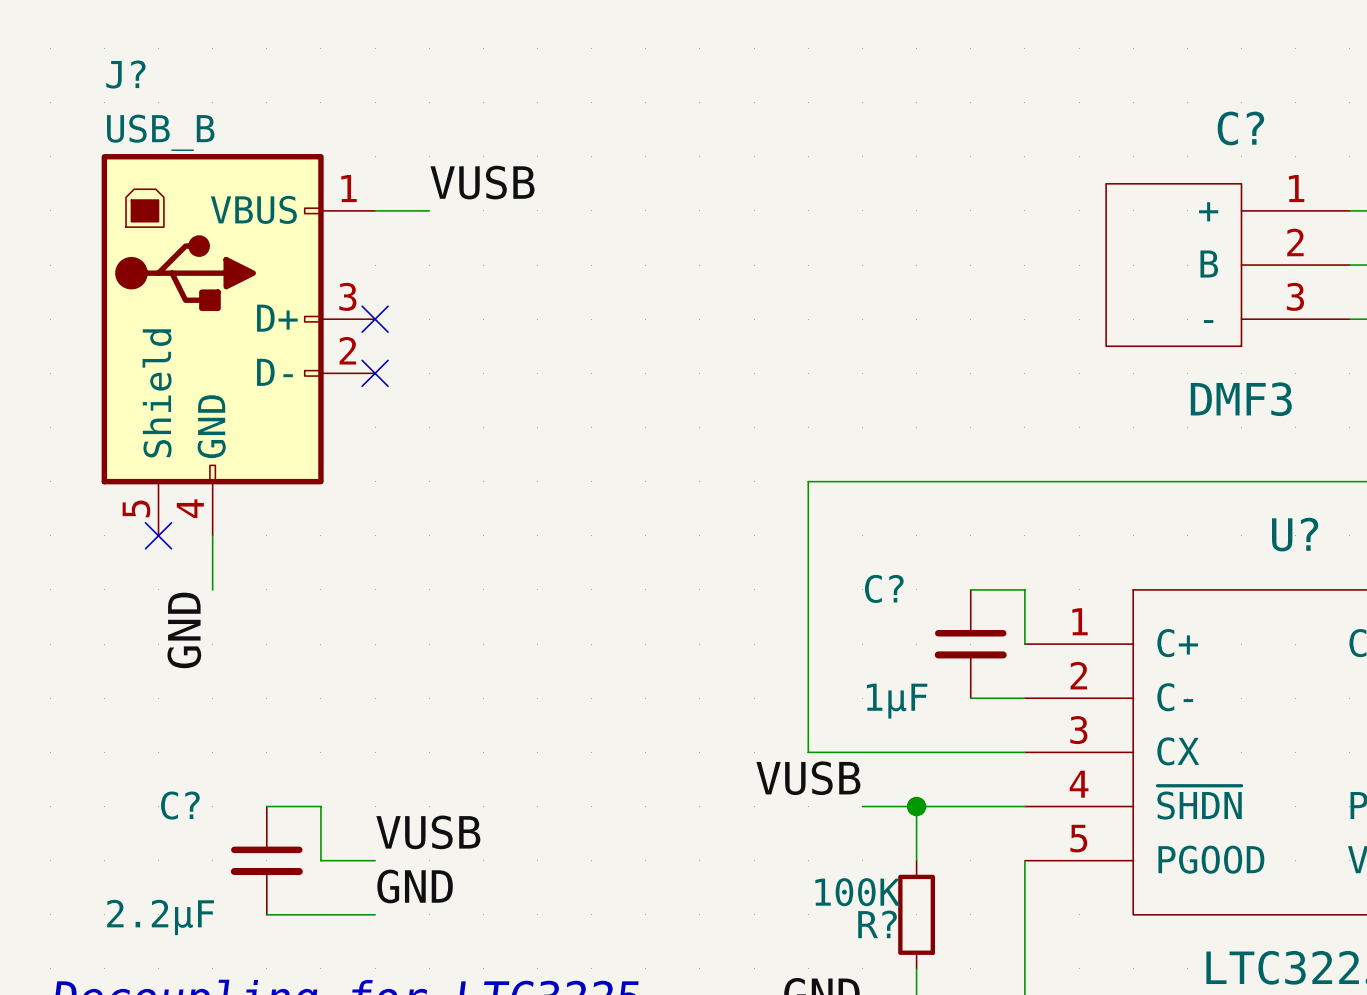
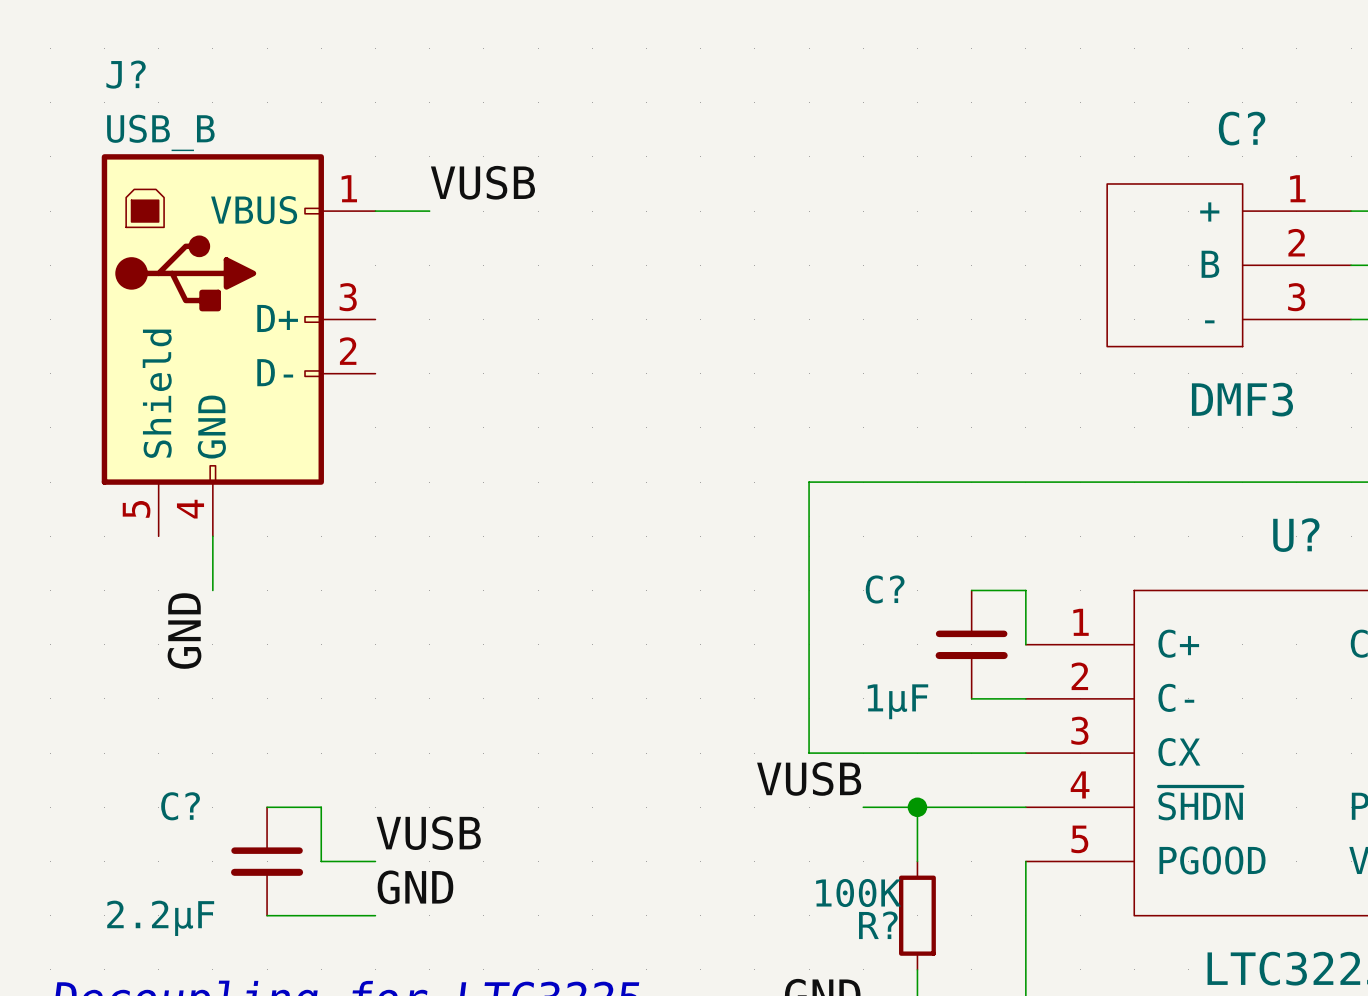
no-connect mark: (375, 319) -> none
no-connect mark: (375, 373) -> none
no-connect mark: (158, 535) -> none

